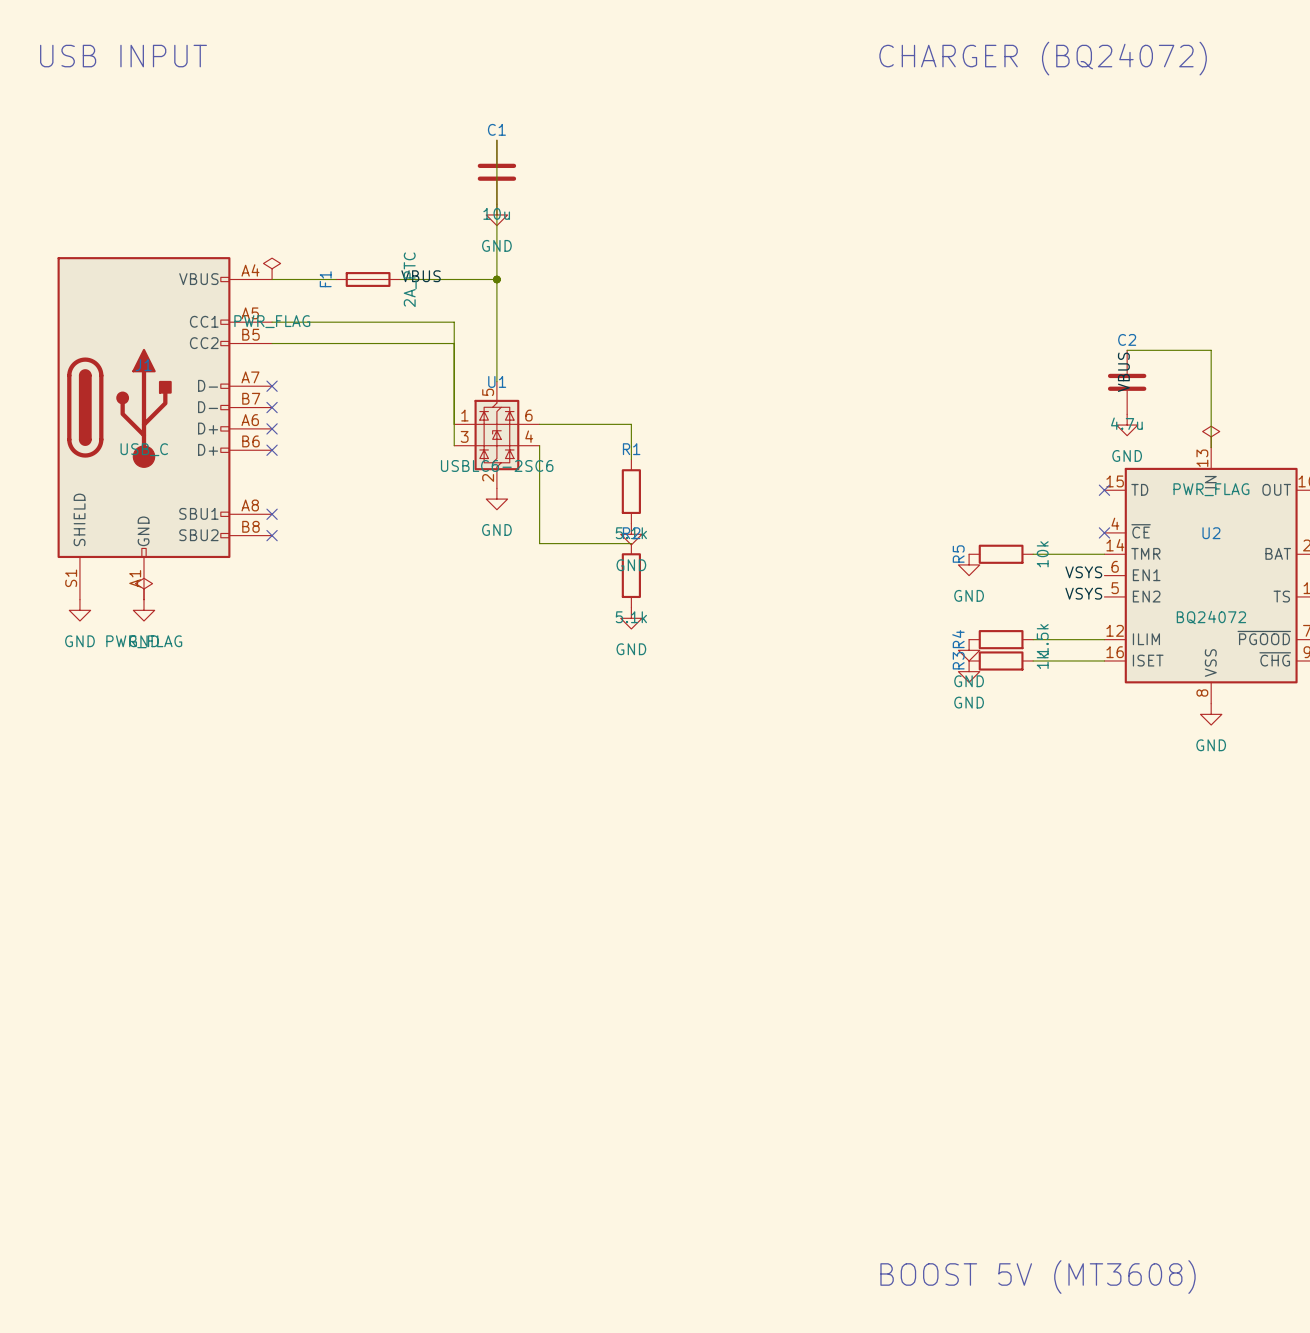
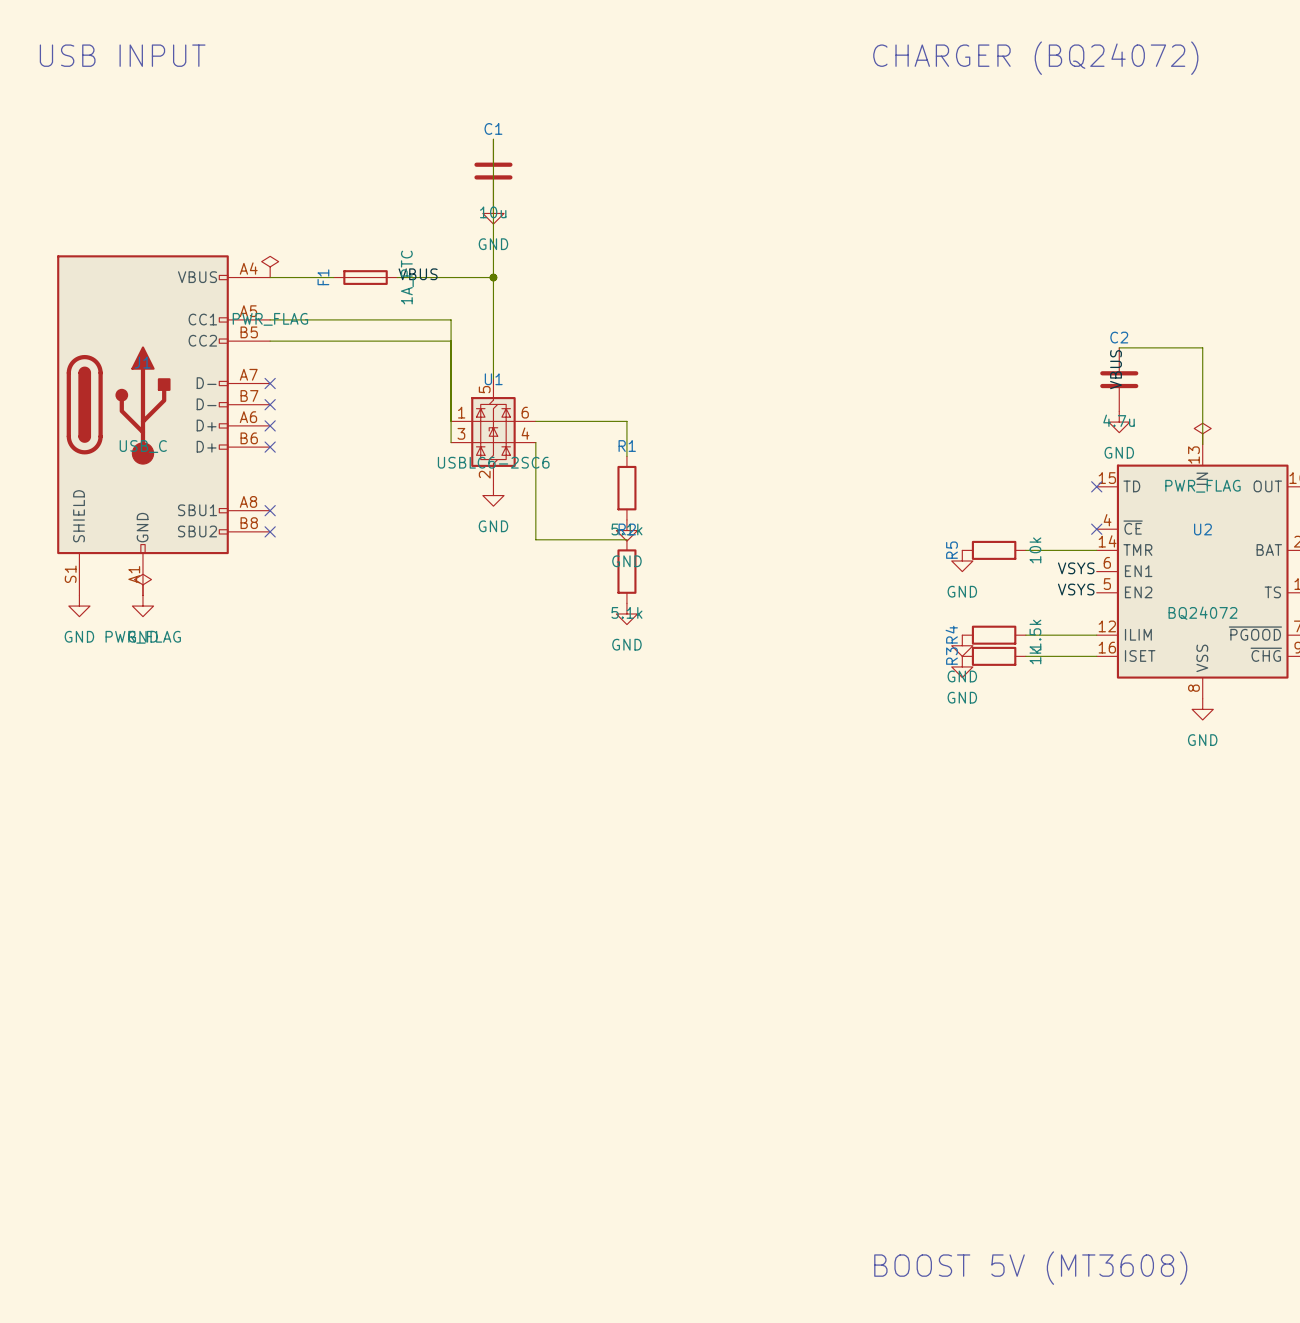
F1 value: 2A_PTC (410, 279) -> 1A_PTC (407, 277)

